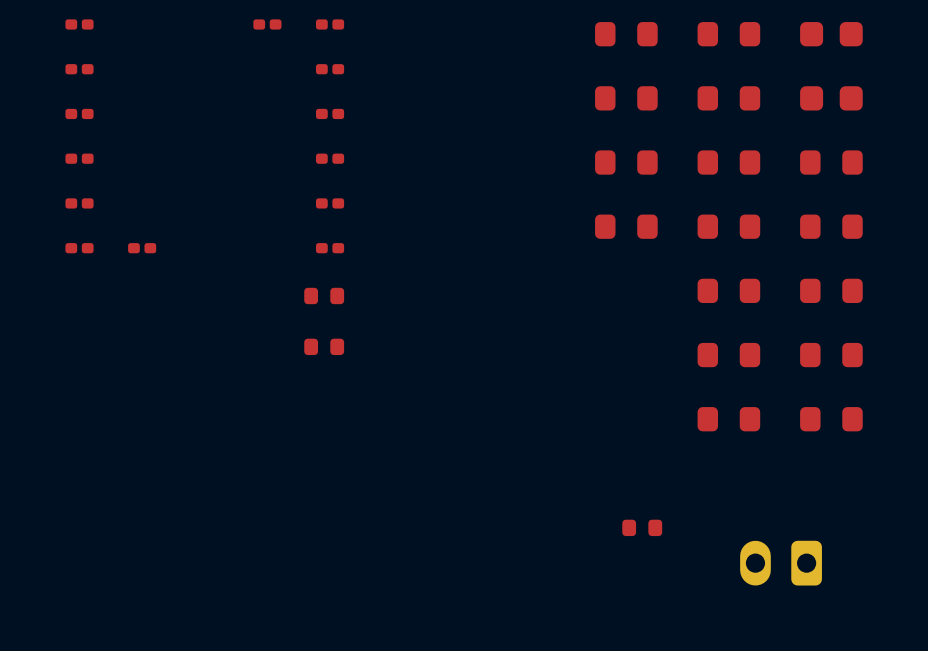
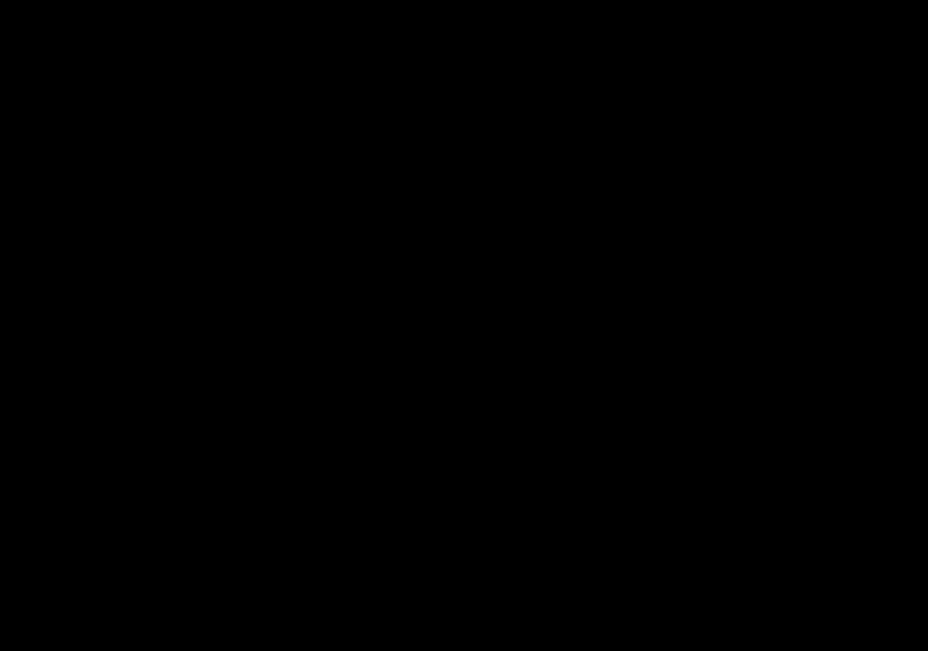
part: (79, 24) -> none
part: (267, 24) -> none
part: (330, 24) -> none
part: (626, 34) -> none
part: (728, 34) -> none
part: (831, 34) -> none
part: (79, 69) -> none
part: (330, 69) -> none
part: (626, 98) -> none
part: (728, 98) -> none
part: (831, 98) -> none
part: (79, 113) -> none
part: (330, 113) -> none
part: (79, 158) -> none
part: (330, 158) -> none
part: (626, 162) -> none
part: (728, 162) -> none
part: (831, 162) -> none
part: (79, 203) -> none
part: (330, 203) -> none
part: (626, 226) -> none
part: (728, 226) -> none
part: (831, 226) -> none
part: (79, 248) -> none
part: (142, 248) -> none
part: (330, 248) -> none
part: (728, 290) -> none
part: (831, 290) -> none
part: (324, 295) -> none
part: (324, 346) -> none
part: (728, 355) -> none
part: (831, 355) -> none
part: (728, 419) -> none
part: (831, 419) -> none
part: (642, 527) -> none
part: (781, 563) -> none

